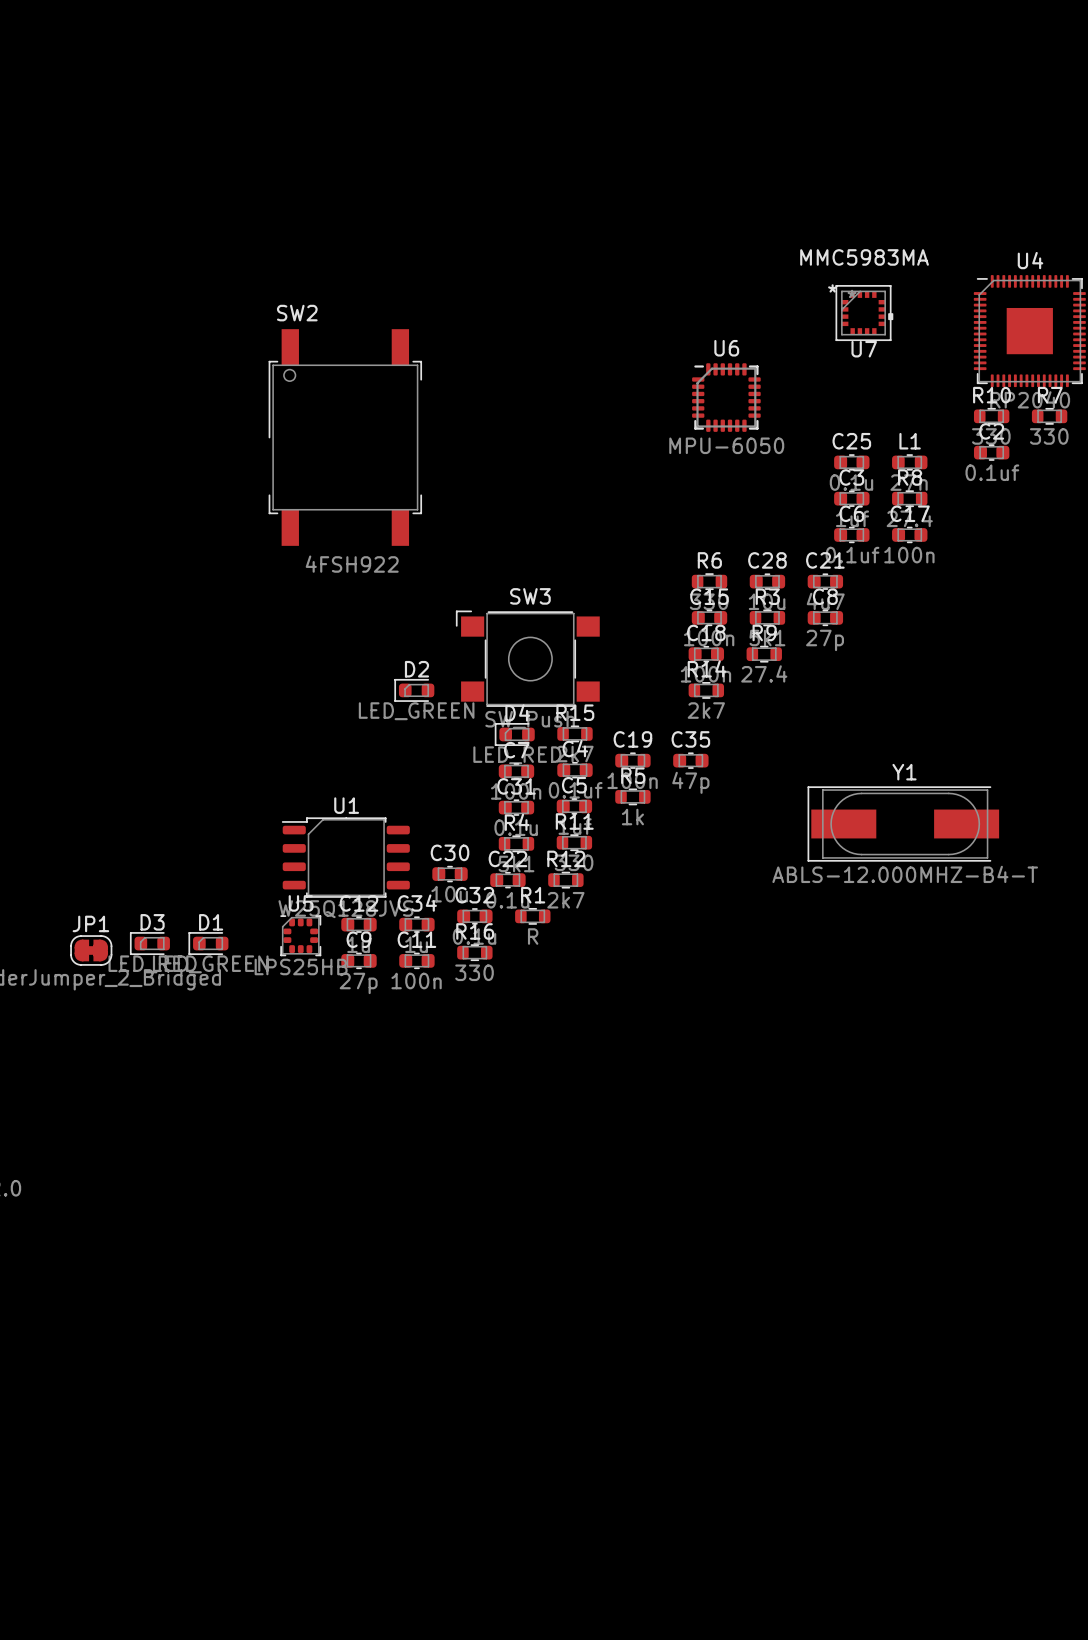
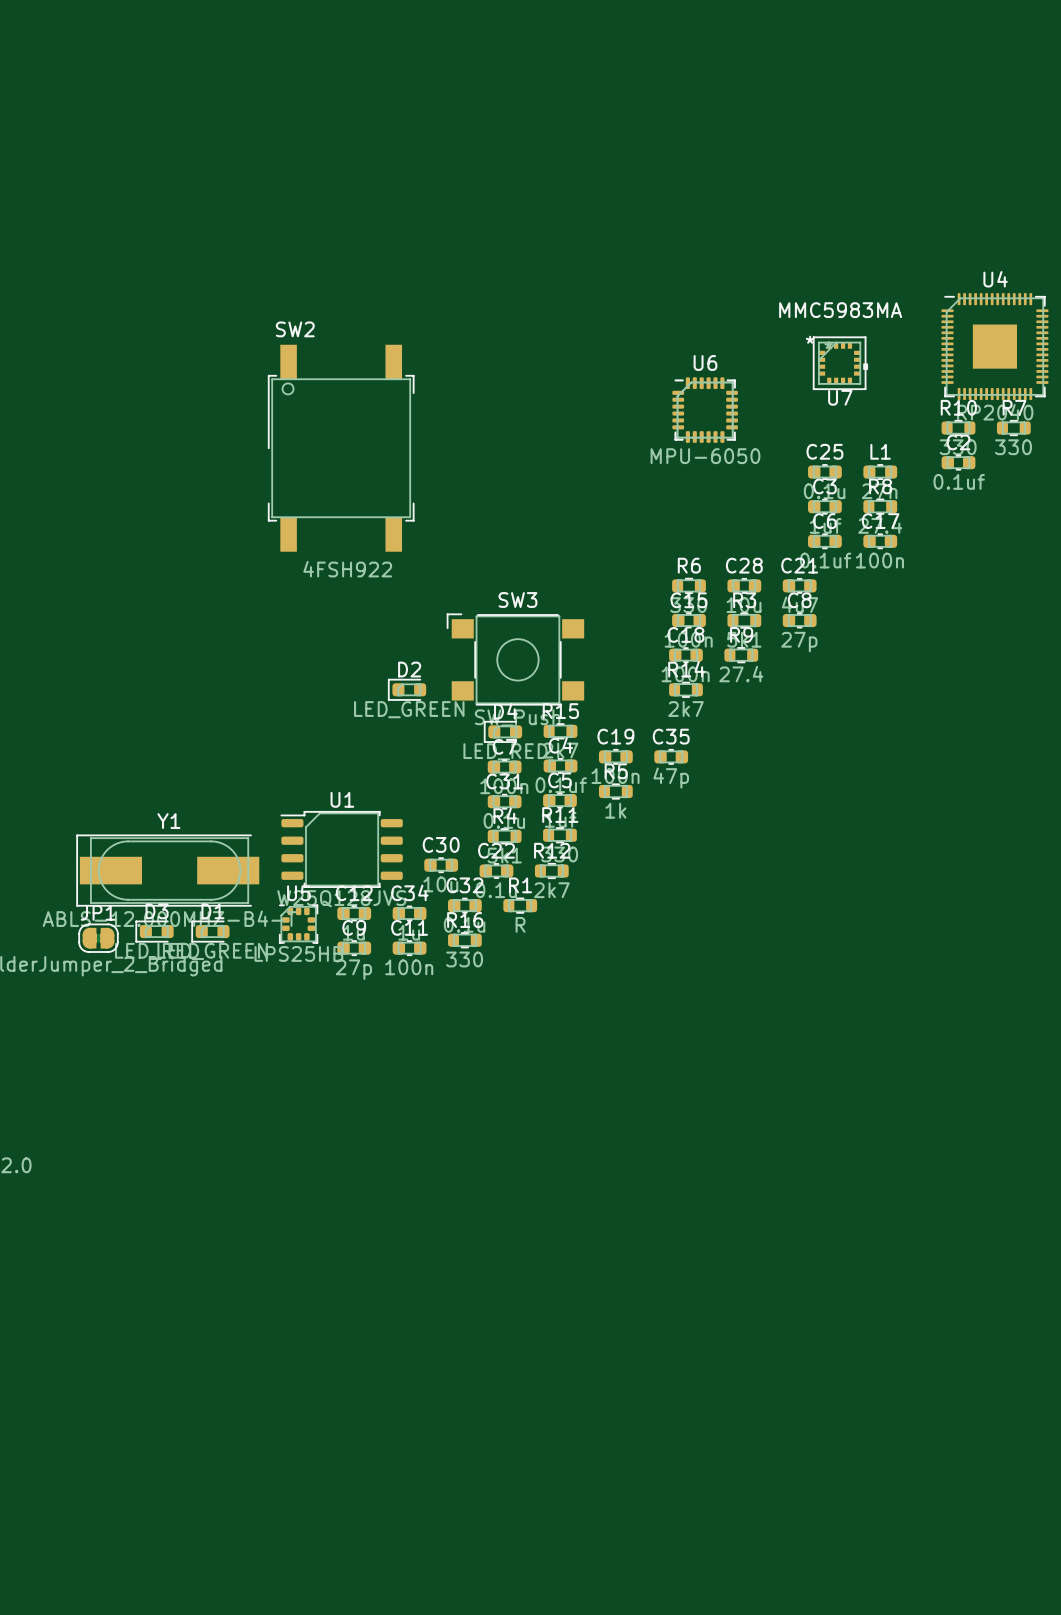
U7 position: (864, 313) -> (840, 363)
Y1 position: (903, 823) -> (167, 870)

